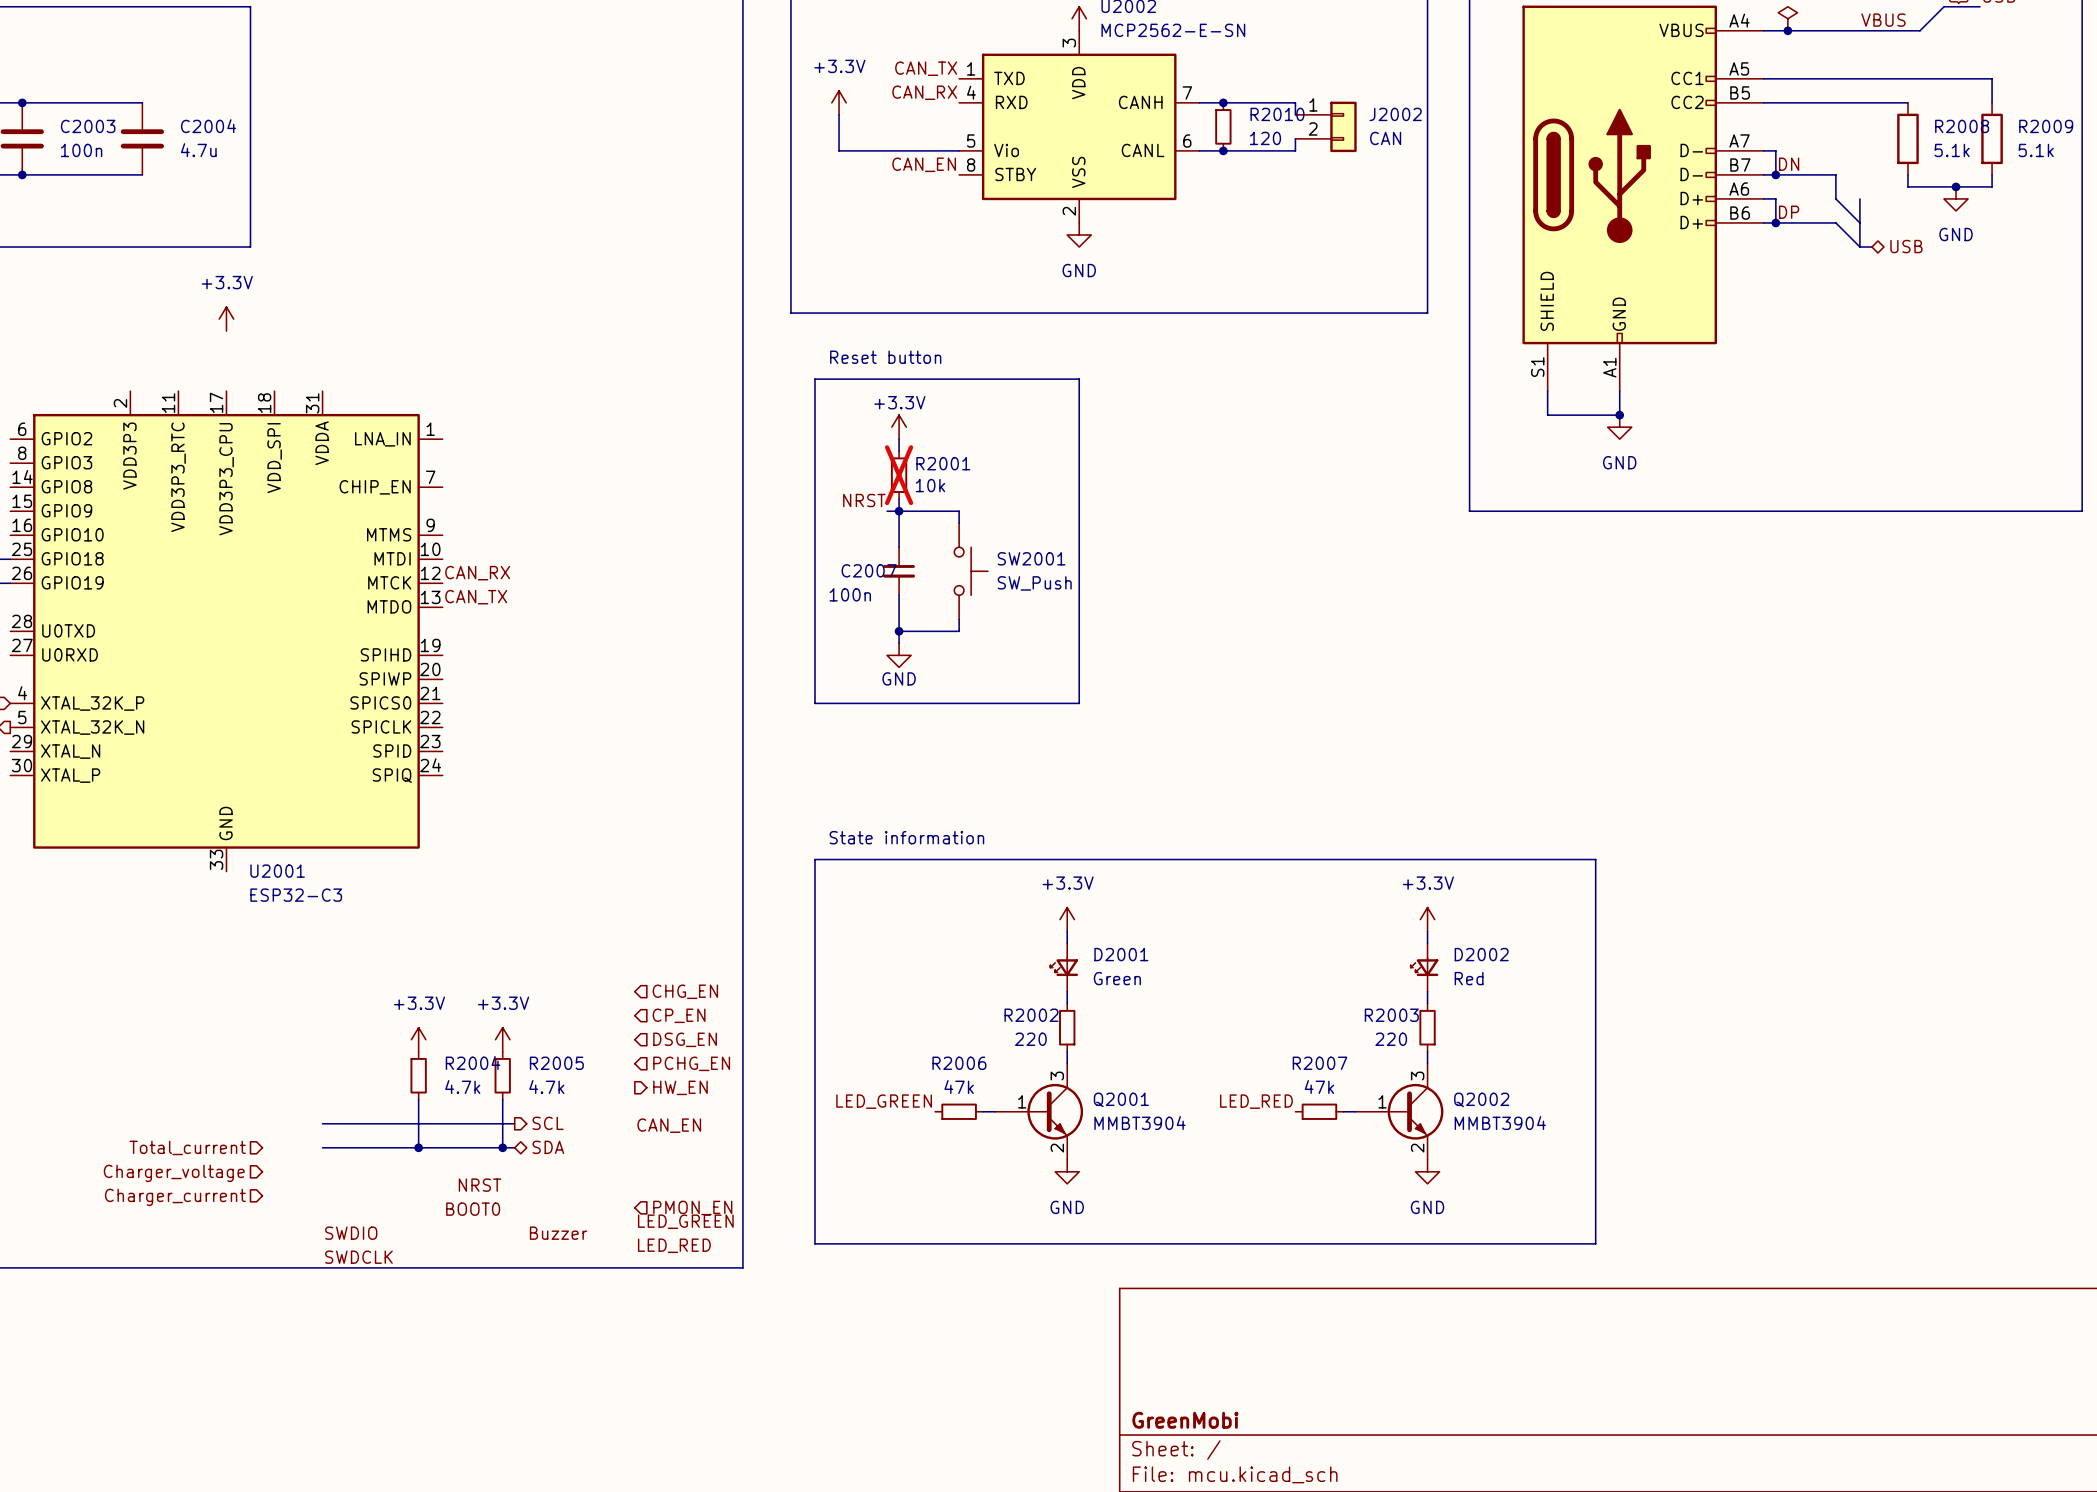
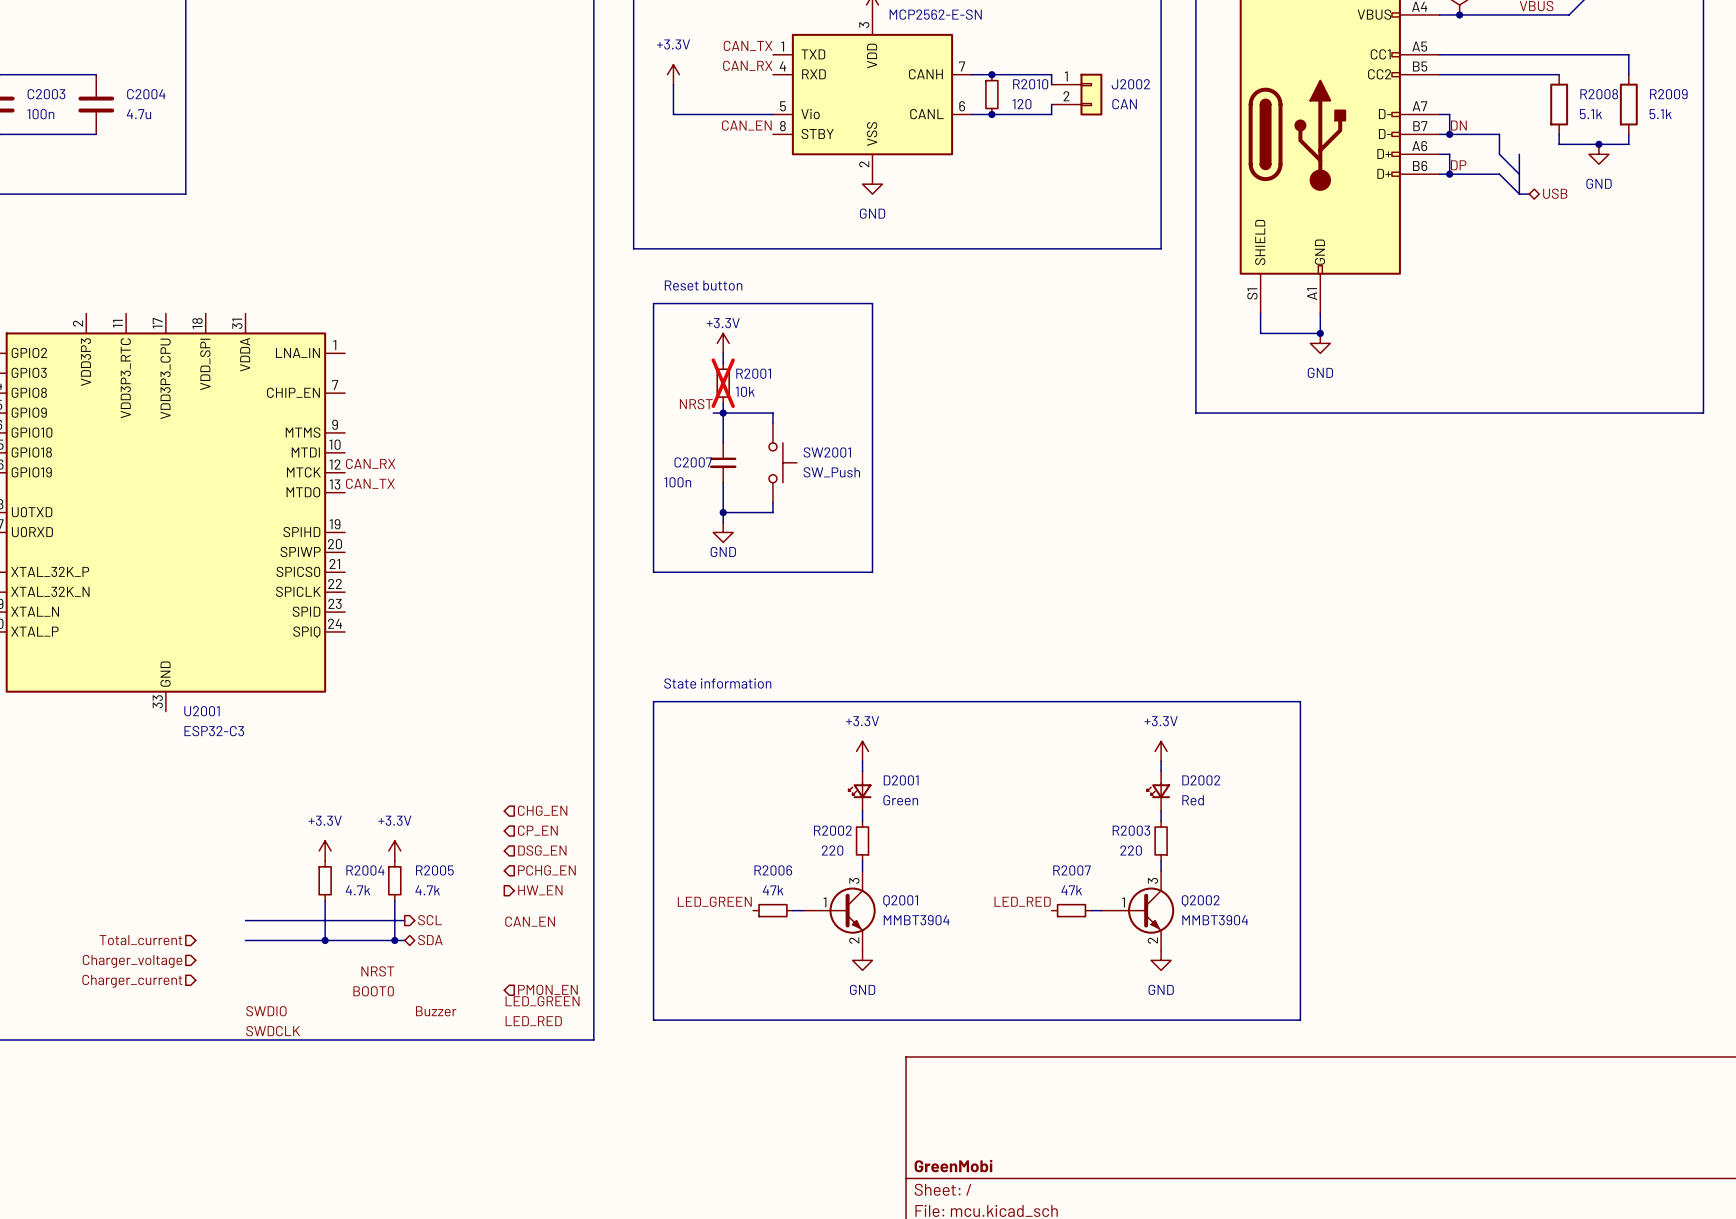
power symbol: +3.3V (226, 319) -> none

